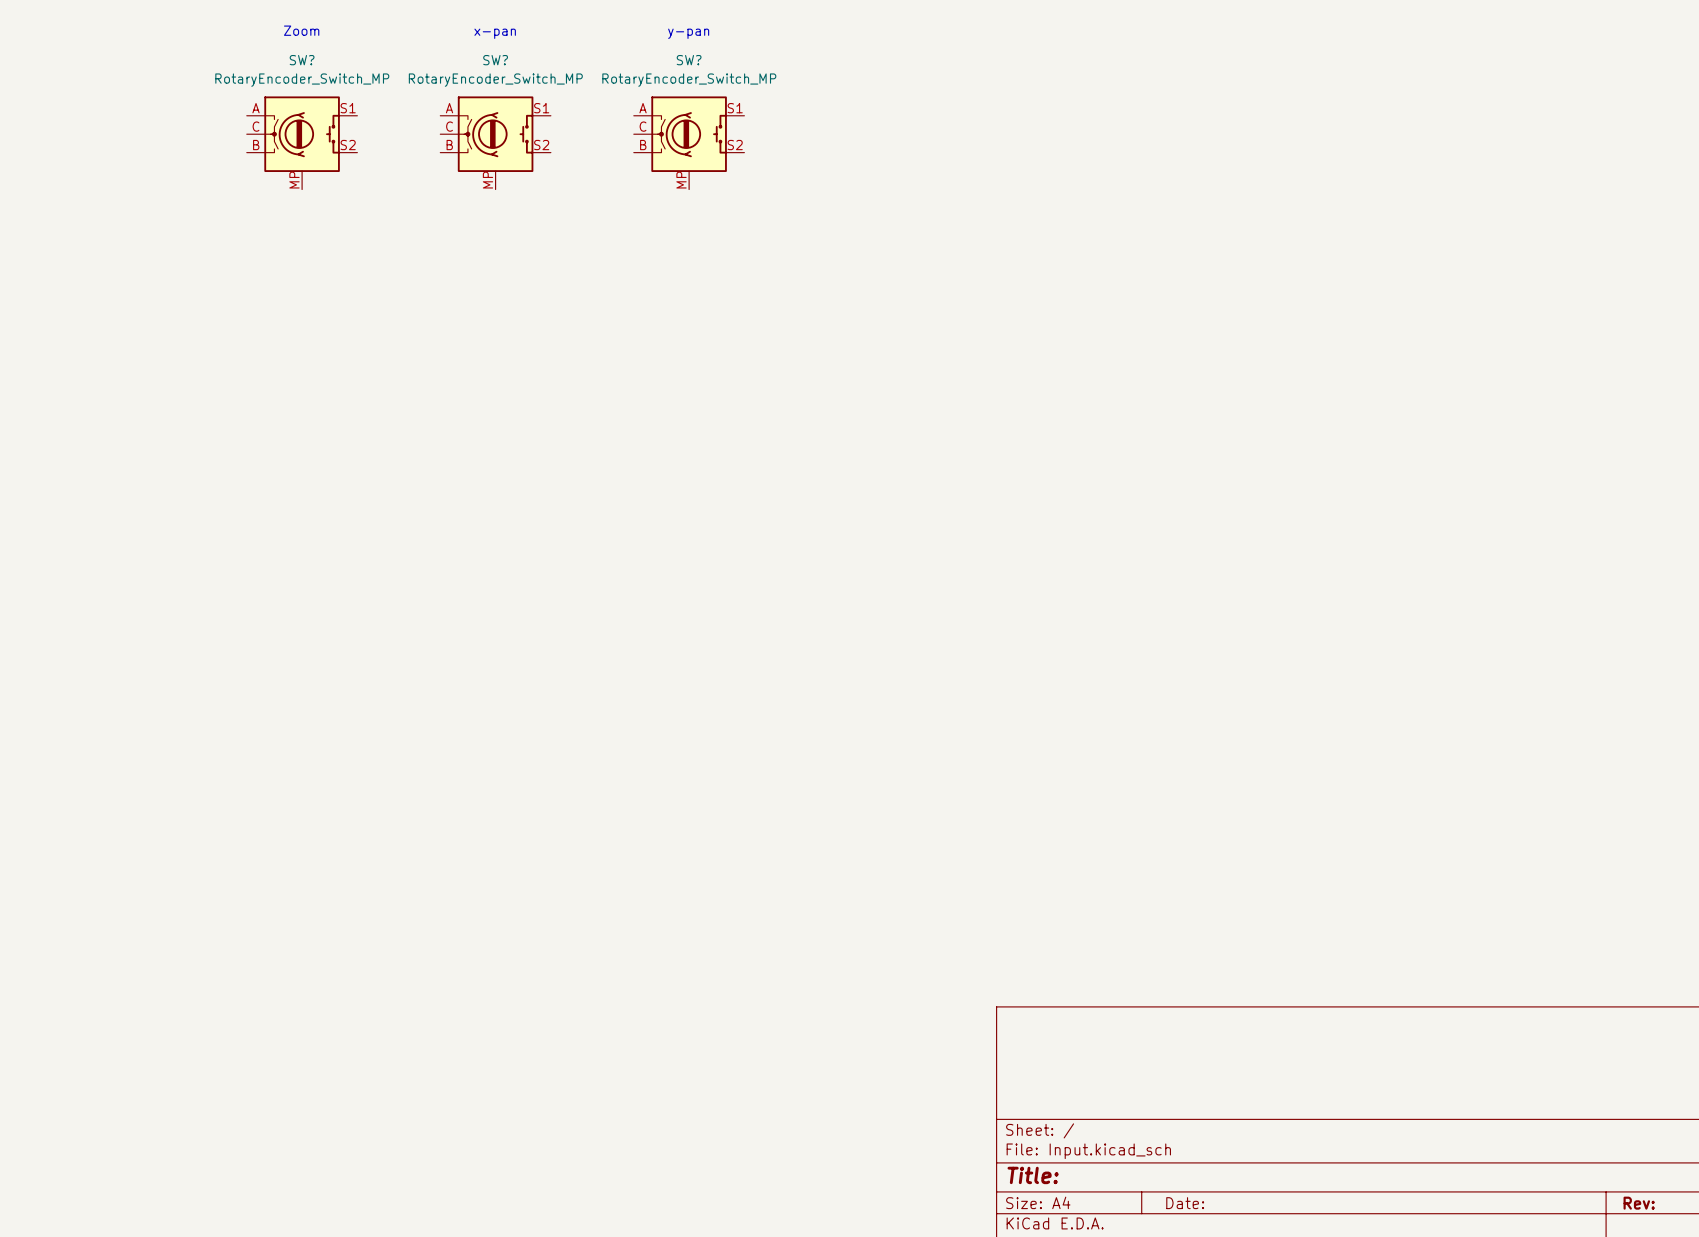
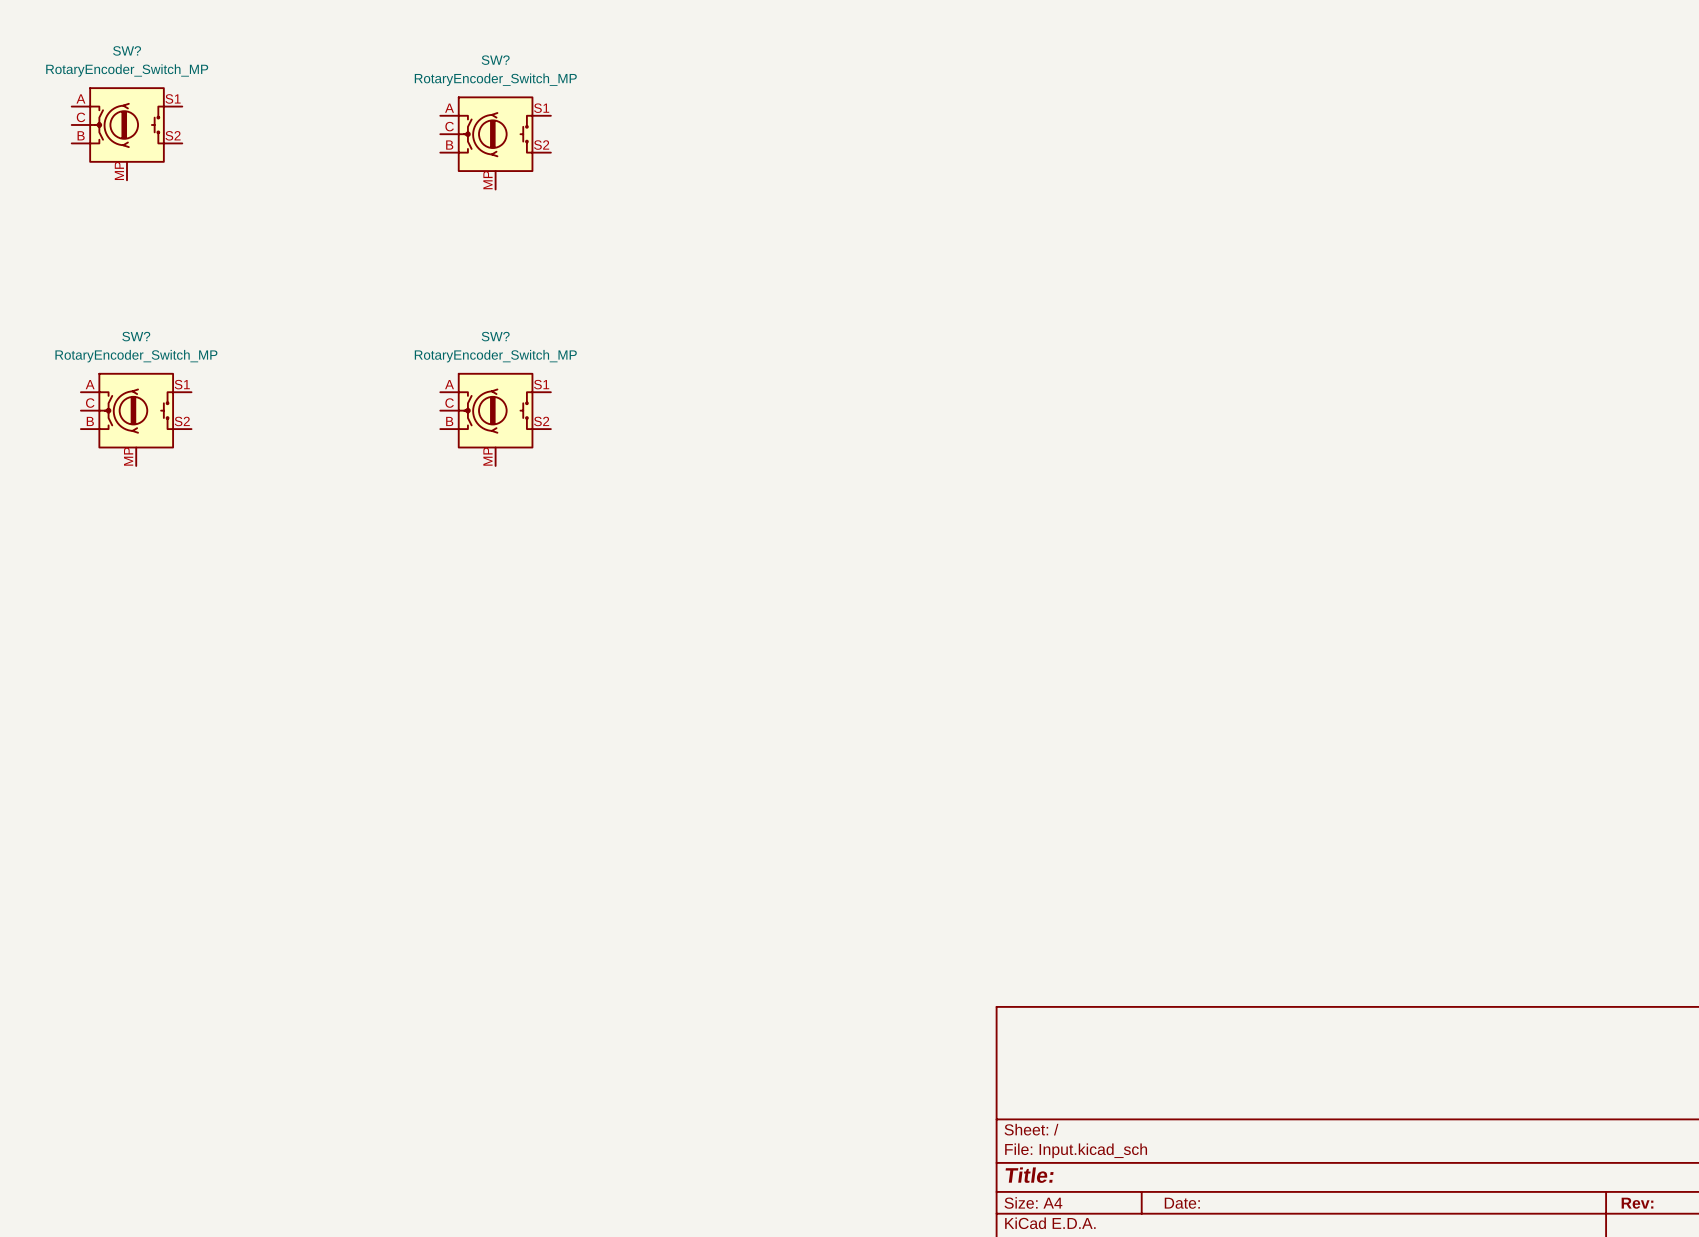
text: Zoom (301, 30) -> none
text: x-pan (495, 33) -> none
text: y-pan (688, 33) -> none
SW?: none -> RotaryEncoder_Switch_MP (127, 133)
SW?: RotaryEncoder_Switch_MP (302, 142) -> none
SW?: RotaryEncoder_Switch_MP (689, 142) -> none
SW?: none -> RotaryEncoder_Switch_MP (136, 419)
SW?: none -> RotaryEncoder_Switch_MP (495, 419)

